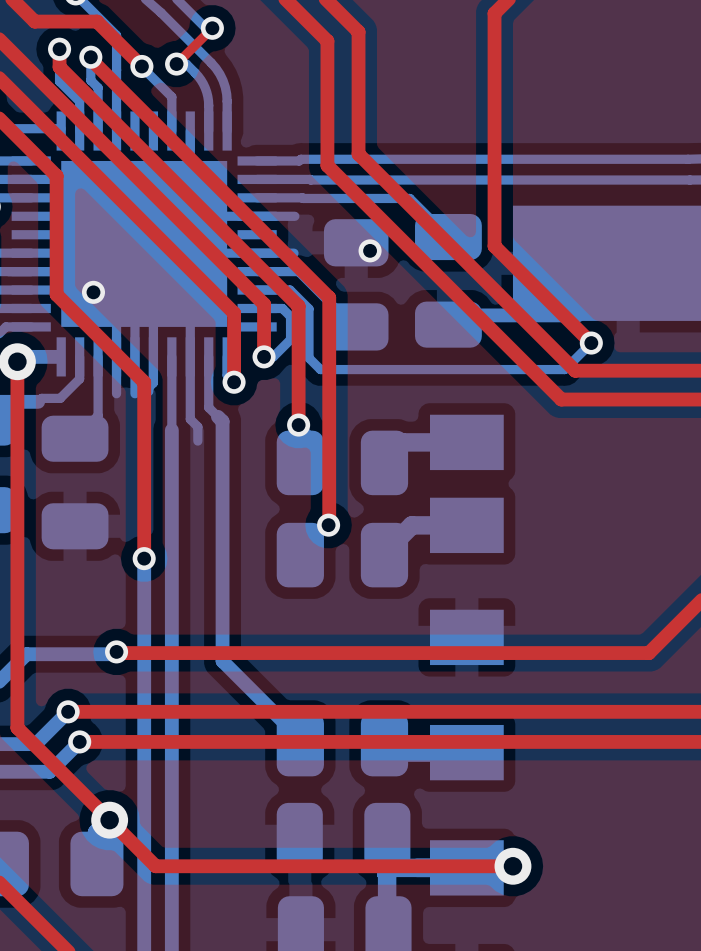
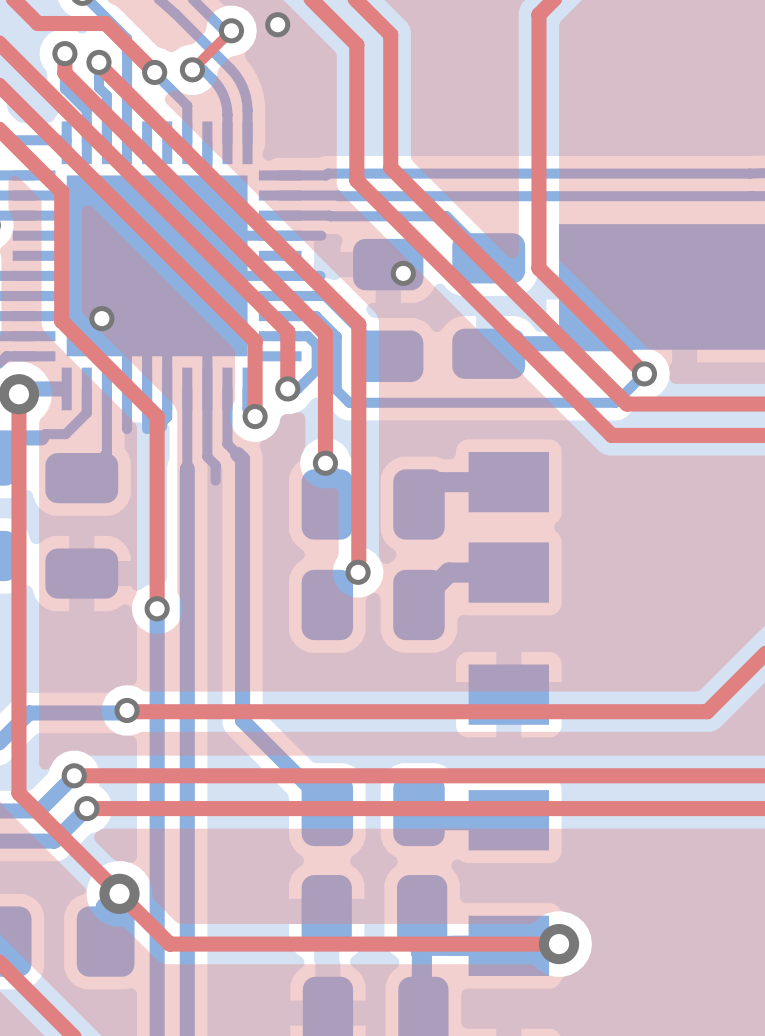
via: none -> (277, 24)

